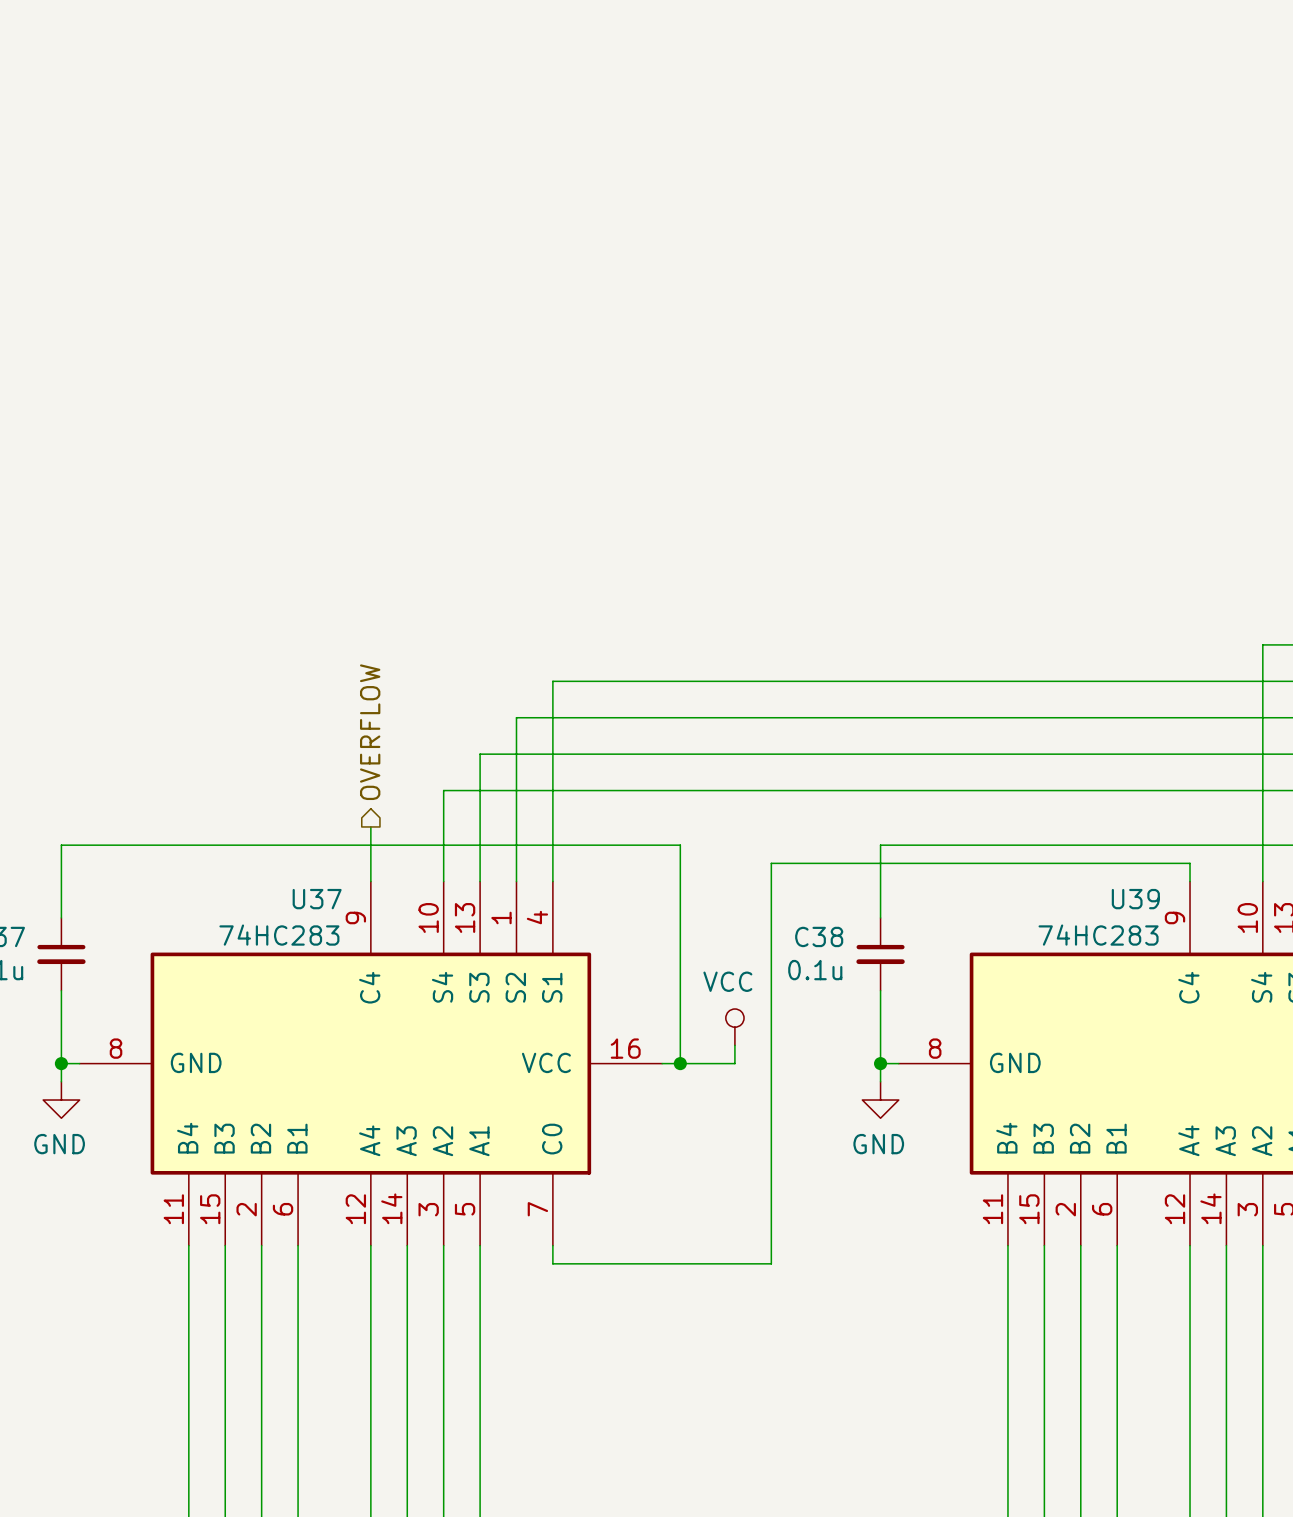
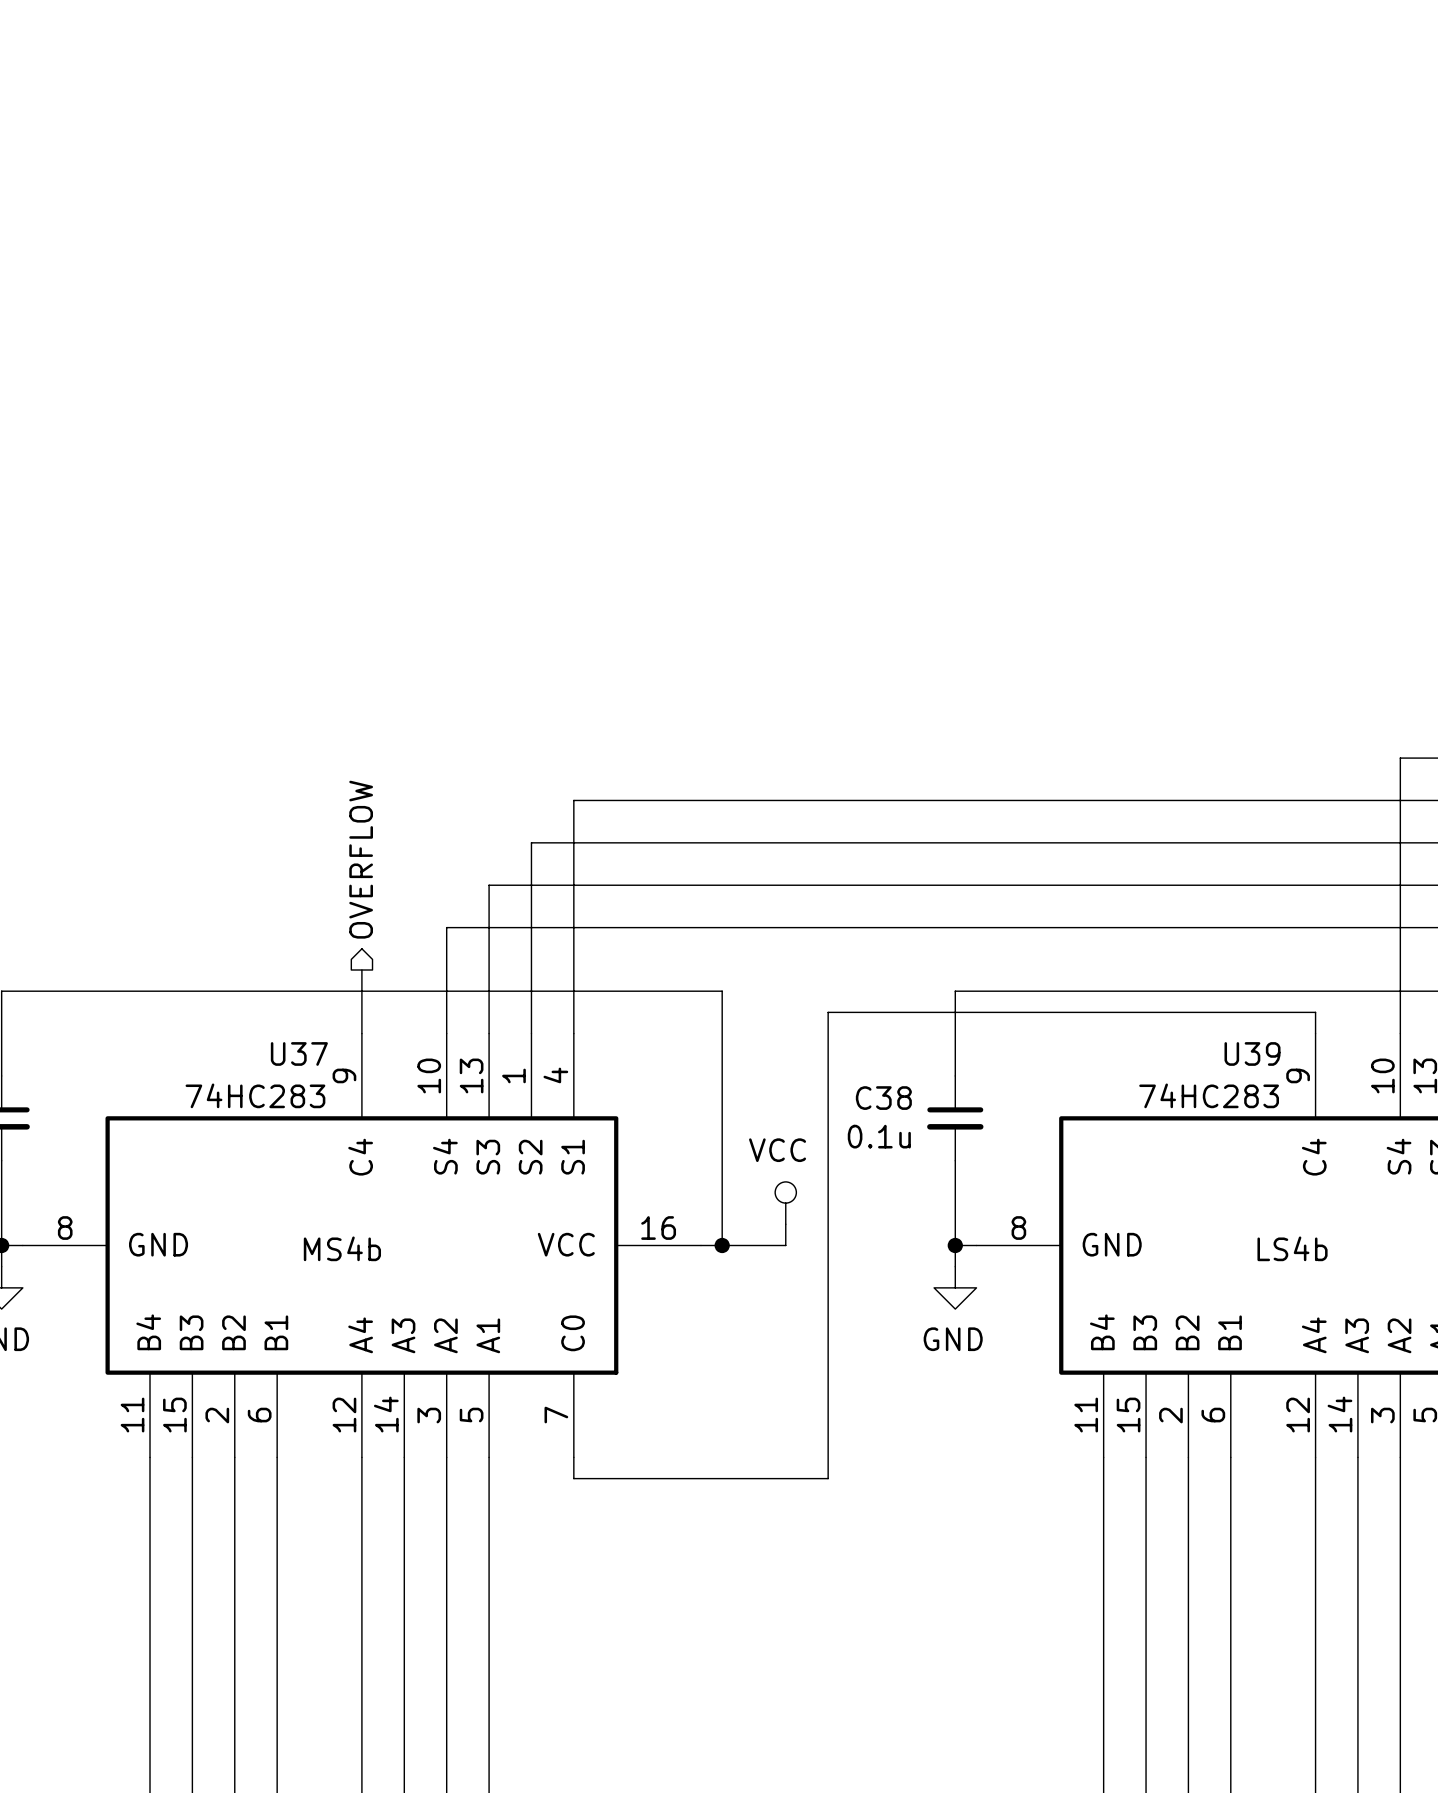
text: none -> MS4b (342, 1248)
text: none -> LS4b (1292, 1248)

